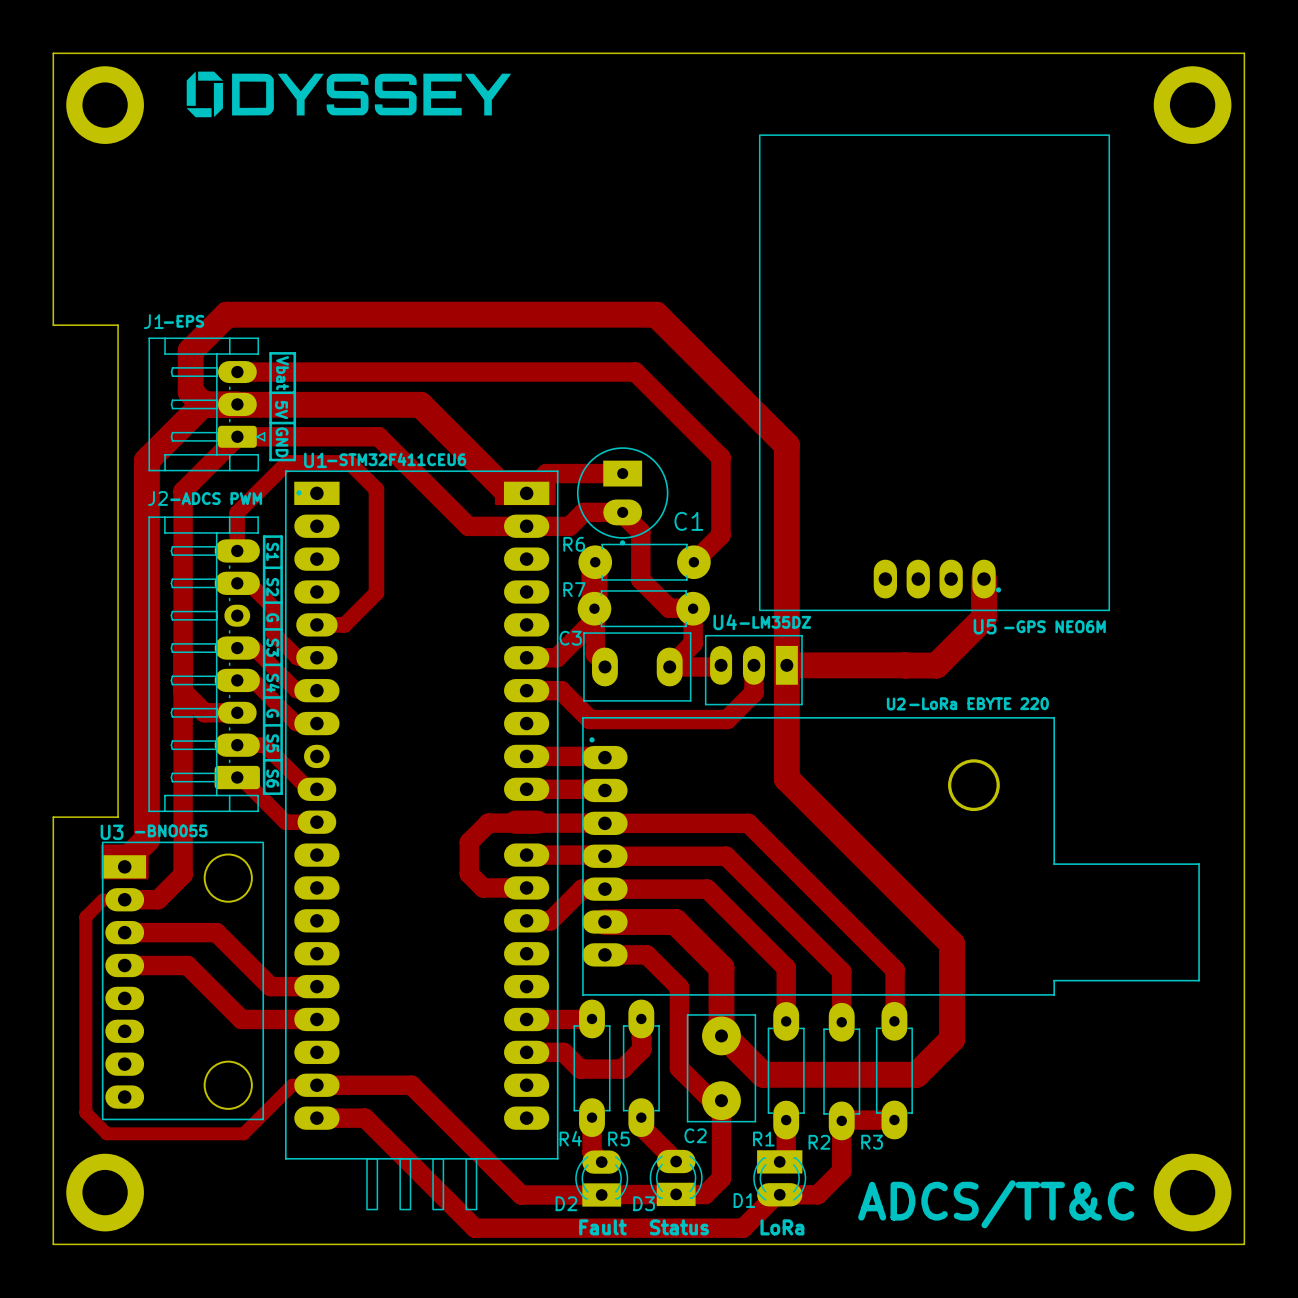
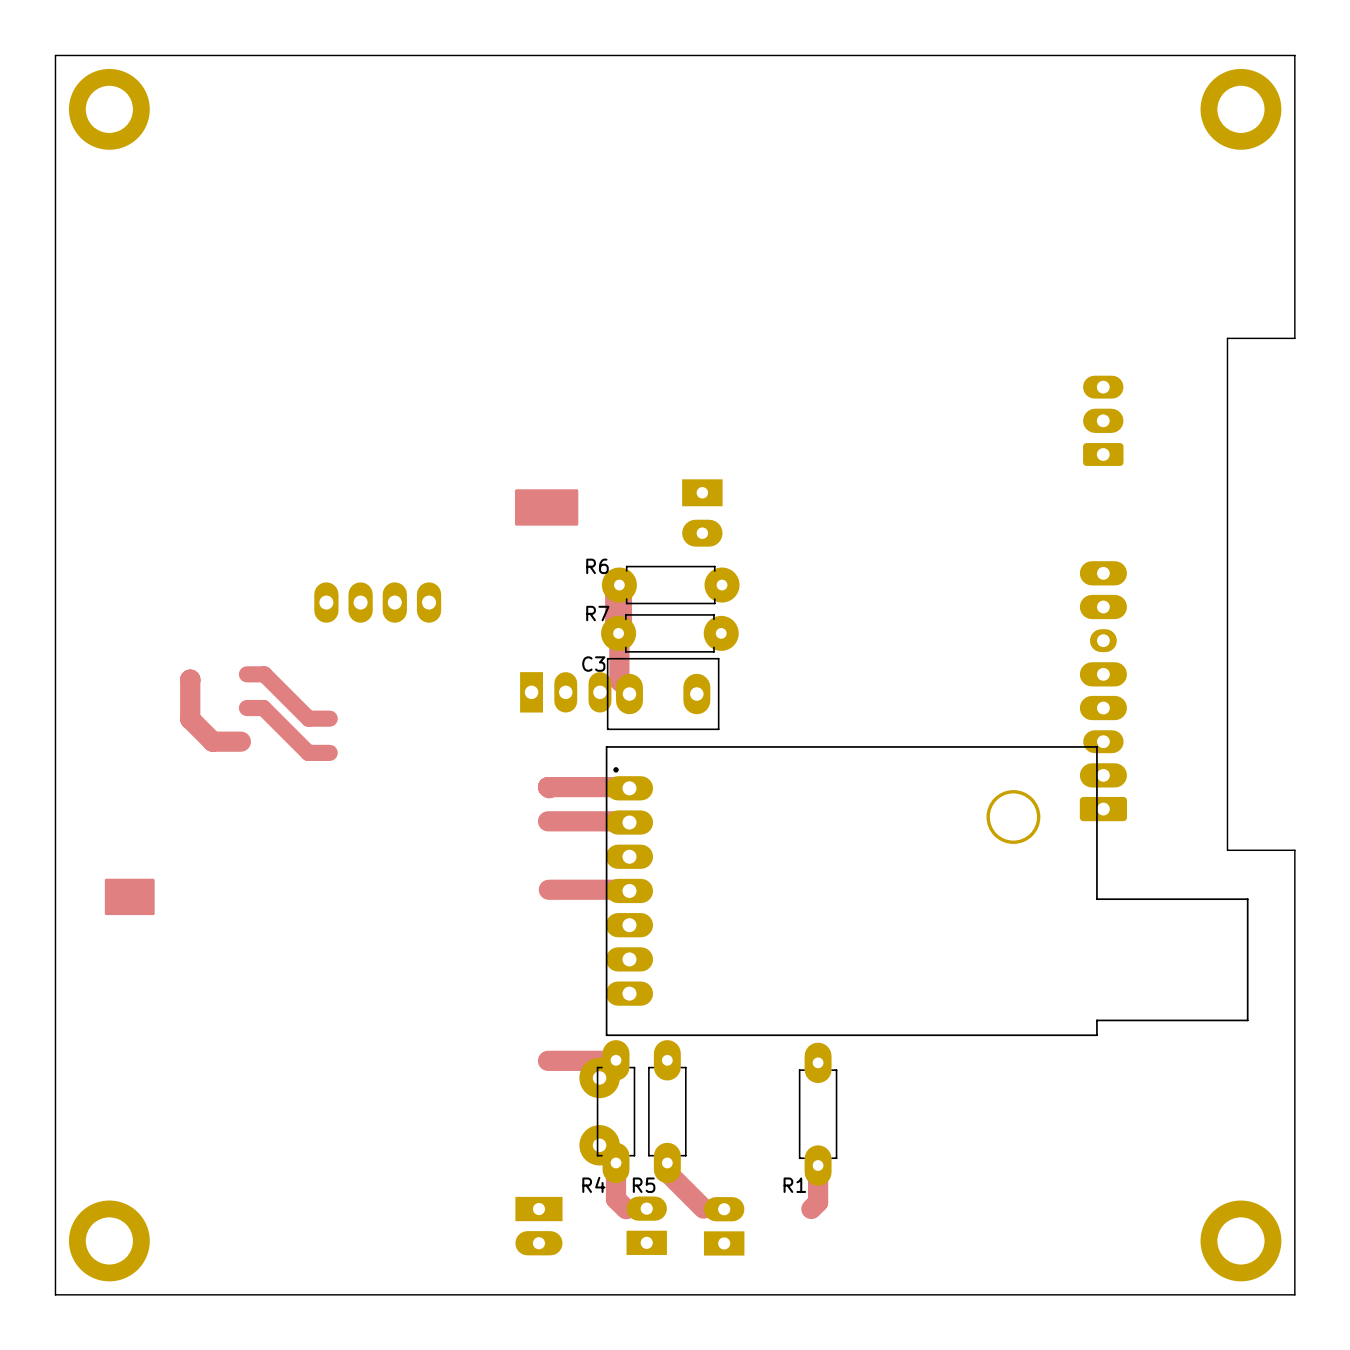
drawing: [186, 71, 511, 118] -> none
text: -EPS (183, 321) -> none
board edge: (53, 325) (118, 325) (118, 817) (53, 817) -> (55, 338) (55, 850)
board edge: (1244, 325) (1244, 817) -> (1294, 338) (1227, 338) (1227, 850) (1294, 850)
line: (270, 353) (294, 353) (294, 460) (270, 460) (270, 353) -> none
track: (237, 372) (635, 372) (720, 457) (720, 535) (693, 562) -> none
U5: (934, 372) -> none
text: Vbat (282, 373) -> none
line: (270, 392) (294, 392) -> none
J1: (206, 404) -> none
track: (237, 404) (203, 404) (146, 460) (146, 839) (124, 861) -> none
part: none -> (1103, 420)
text: 5V (281, 410) -> none
line: (270, 423) (294, 423) -> none
track: (236, 436) (378, 436) (468, 526) (569, 526) (583, 512) (621, 512) (640, 532) (640, 579) (669, 608) (693, 608) (693, 643) (669, 666) (719, 666) (721, 665) -> none
track: (237, 436) (183, 491) (183, 874) (158, 899) (124, 899) -> none
text: GND (282, 442) -> none
text: -STM32F411CEU6 (396, 459) -> none
track: (622, 475) (621, 473) (546, 473) (526, 493) -> none
track: (525, 489) (505, 489) (420, 404) (203, 404) (190, 391) (190, 350) (226, 314) (656, 314) (786, 445) (786, 778) (952, 943) (952, 1039) (916, 1074) (763, 1074) (721, 1033) (721, 967) (675, 922) (604, 922) -> none
C1 side: top (622, 496) -> bottom (702, 512)
text: -ADCS PWM (216, 498) -> none
line: (264, 536) (281, 536) (281, 793) (264, 793) (264, 536) -> none
track: (237, 550) (237, 512) (287, 462) (349, 462) (376, 489) (376, 593) (344, 624) (310, 624) -> none
text: S1 (272, 551) -> none
line: (264, 567) (281, 567) -> none
part: none -> (377, 602)
track: (984, 579) (984, 618) (936, 665) (786, 665) -> none
track: (237, 583) (249, 583) (274, 608) (274, 634) (297, 657) (316, 657) -> none
text: S2 (272, 587) -> none
line: (264, 602) (281, 602) -> none
track: (594, 608) (594, 620) (556, 657) (526, 657) (533, 657) -> none
text: G (272, 617) -> none
text: -LM35DZ (775, 622) -> none
text: -GPS NEO6M (1054, 626) -> none
line: (264, 629) (281, 629) -> none
text: S3 (272, 647) -> none
J2: (204, 664) -> none
line: (264, 664) (281, 664) -> none
part: none -> (1103, 691)
track: (753, 665) (753, 692) (727, 719) (590, 719) (561, 690) (526, 690) -> none
U4 side: top (753, 670) -> bottom (565, 692)
text: S4 (272, 683) -> none
line: (264, 697) (281, 697) -> none
text: -LoRa EBYTE 220 (979, 703) -> none
text: U2 (896, 704) -> none
text: G (272, 713) -> none
line: (264, 725) (281, 725) -> none
text: S5 (272, 743) -> none
track: (237, 745) (264, 745) (308, 789) (316, 789) -> none
line: (264, 760) (281, 760) -> none
track: (237, 777) (241, 777) (285, 822) (316, 822) -> none
text: S6 (272, 778) -> none
text: -BNO055 (171, 830) -> none
U1: (421, 840) -> none
track: (604, 856) (726, 856) (841, 971) (841, 1022) -> none
track: (526, 887) (483, 887) (469, 873) (469, 842) (488, 823) (748, 823) (895, 970) (894, 1021) -> none
track: (103, 899) (85, 916) (85, 1112) (106, 1133) (243, 1133) (292, 1085) (311, 1085) -> none
track: (526, 920) (550, 920) (582, 889) (707, 889) (786, 967) (786, 1021) -> none
track: (124, 932) (216, 932) (270, 986) (316, 986) -> none
track: (604, 954) (646, 954) (679, 987) (679, 1068) (711, 1100) (721, 1100) (721, 1178) (705, 1194) (602, 1194) -> none
track: (124, 965) (187, 965) (241, 1019) (316, 1019) -> none
U3: (182, 980) -> none
track: (641, 1018) (641, 1049) (622, 1069) (580, 1069) (563, 1052) (526, 1052) -> none
C2 side: top (721, 1068) -> bottom (599, 1111)
R3: (894, 1070) -> none
R2: (841, 1071) -> none
track: (316, 1085) (411, 1085) (521, 1194) (603, 1194) -> none
track: (316, 1118) (365, 1118) (475, 1228) (743, 1228) (776, 1194) (817, 1194) (841, 1170) (842, 1120) (894, 1120) -> none
D3 side: top (676, 1177) -> bottom (646, 1225)
D2 side: top (601, 1178) -> bottom (724, 1226)
D1 side: top (779, 1178) -> bottom (538, 1226)
text: ADCS/TT&C (996, 1204) -> none
text: Fault (602, 1227) -> none
text: Status (679, 1227) -> none
text: LoRa (782, 1227) -> none

